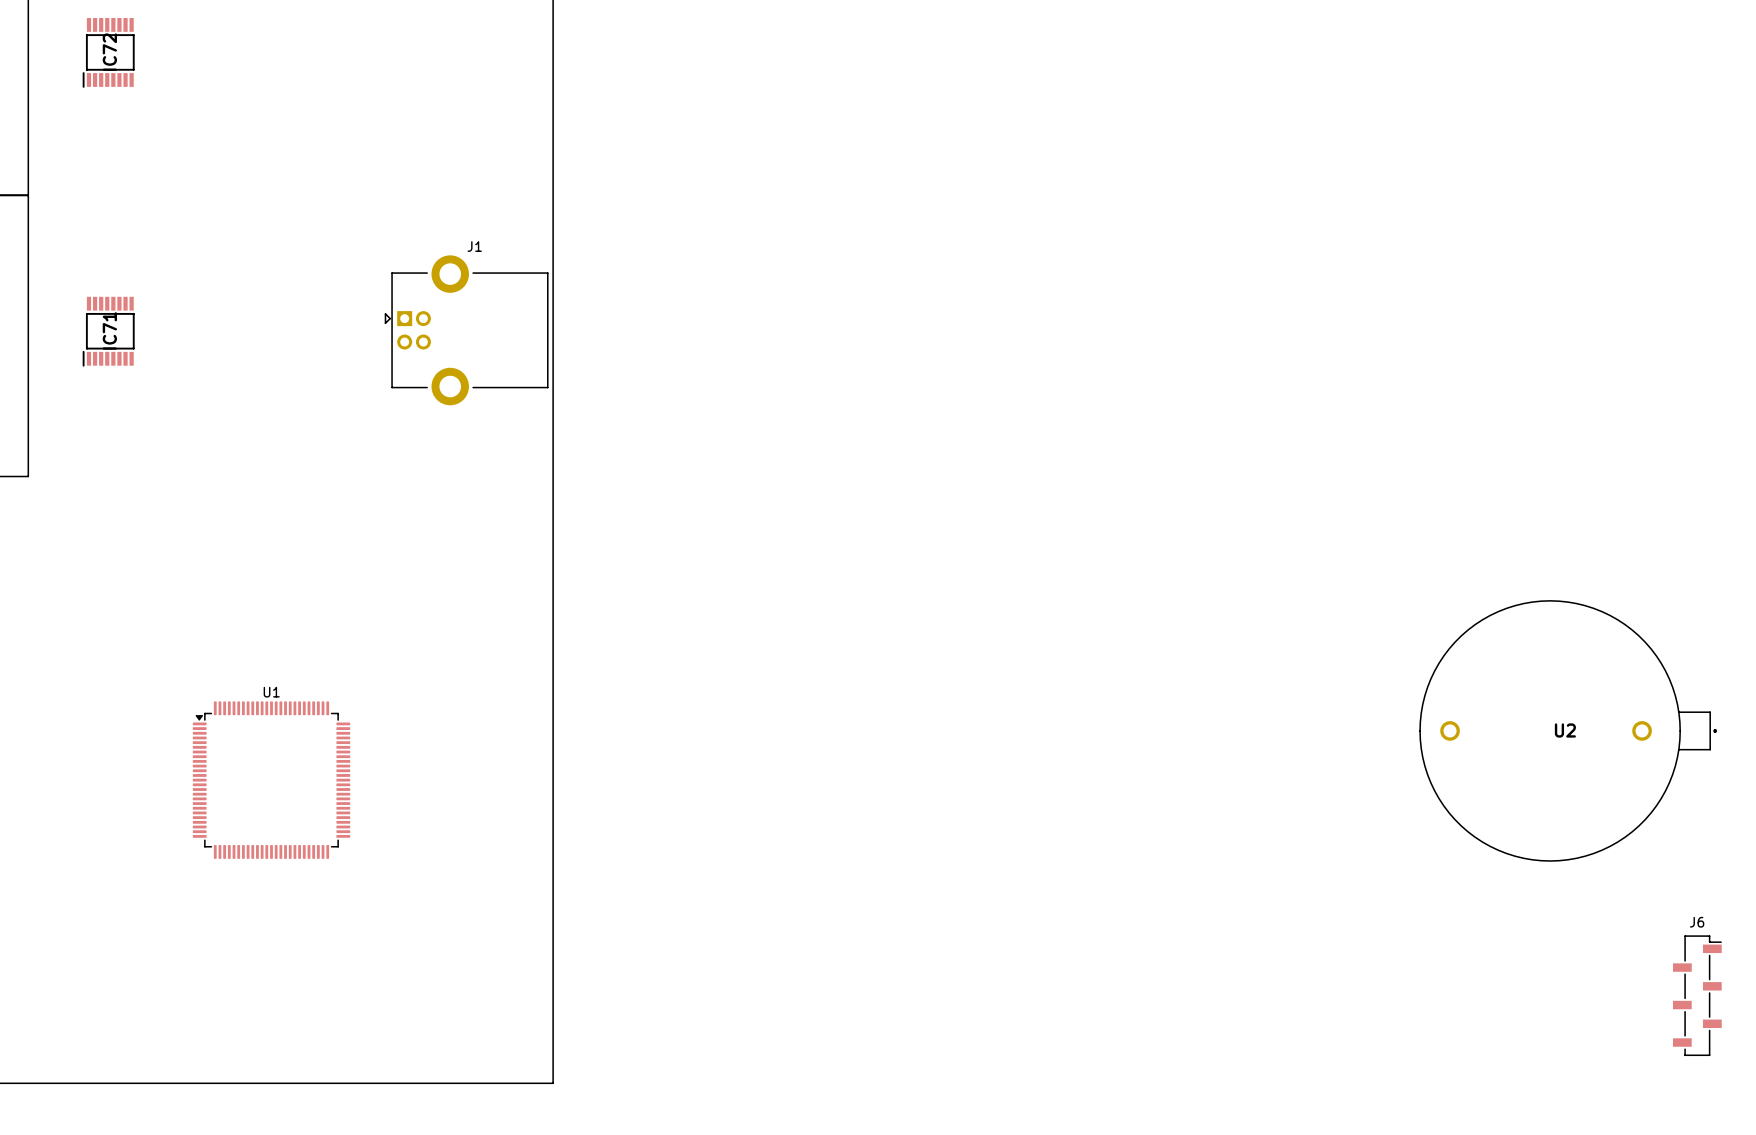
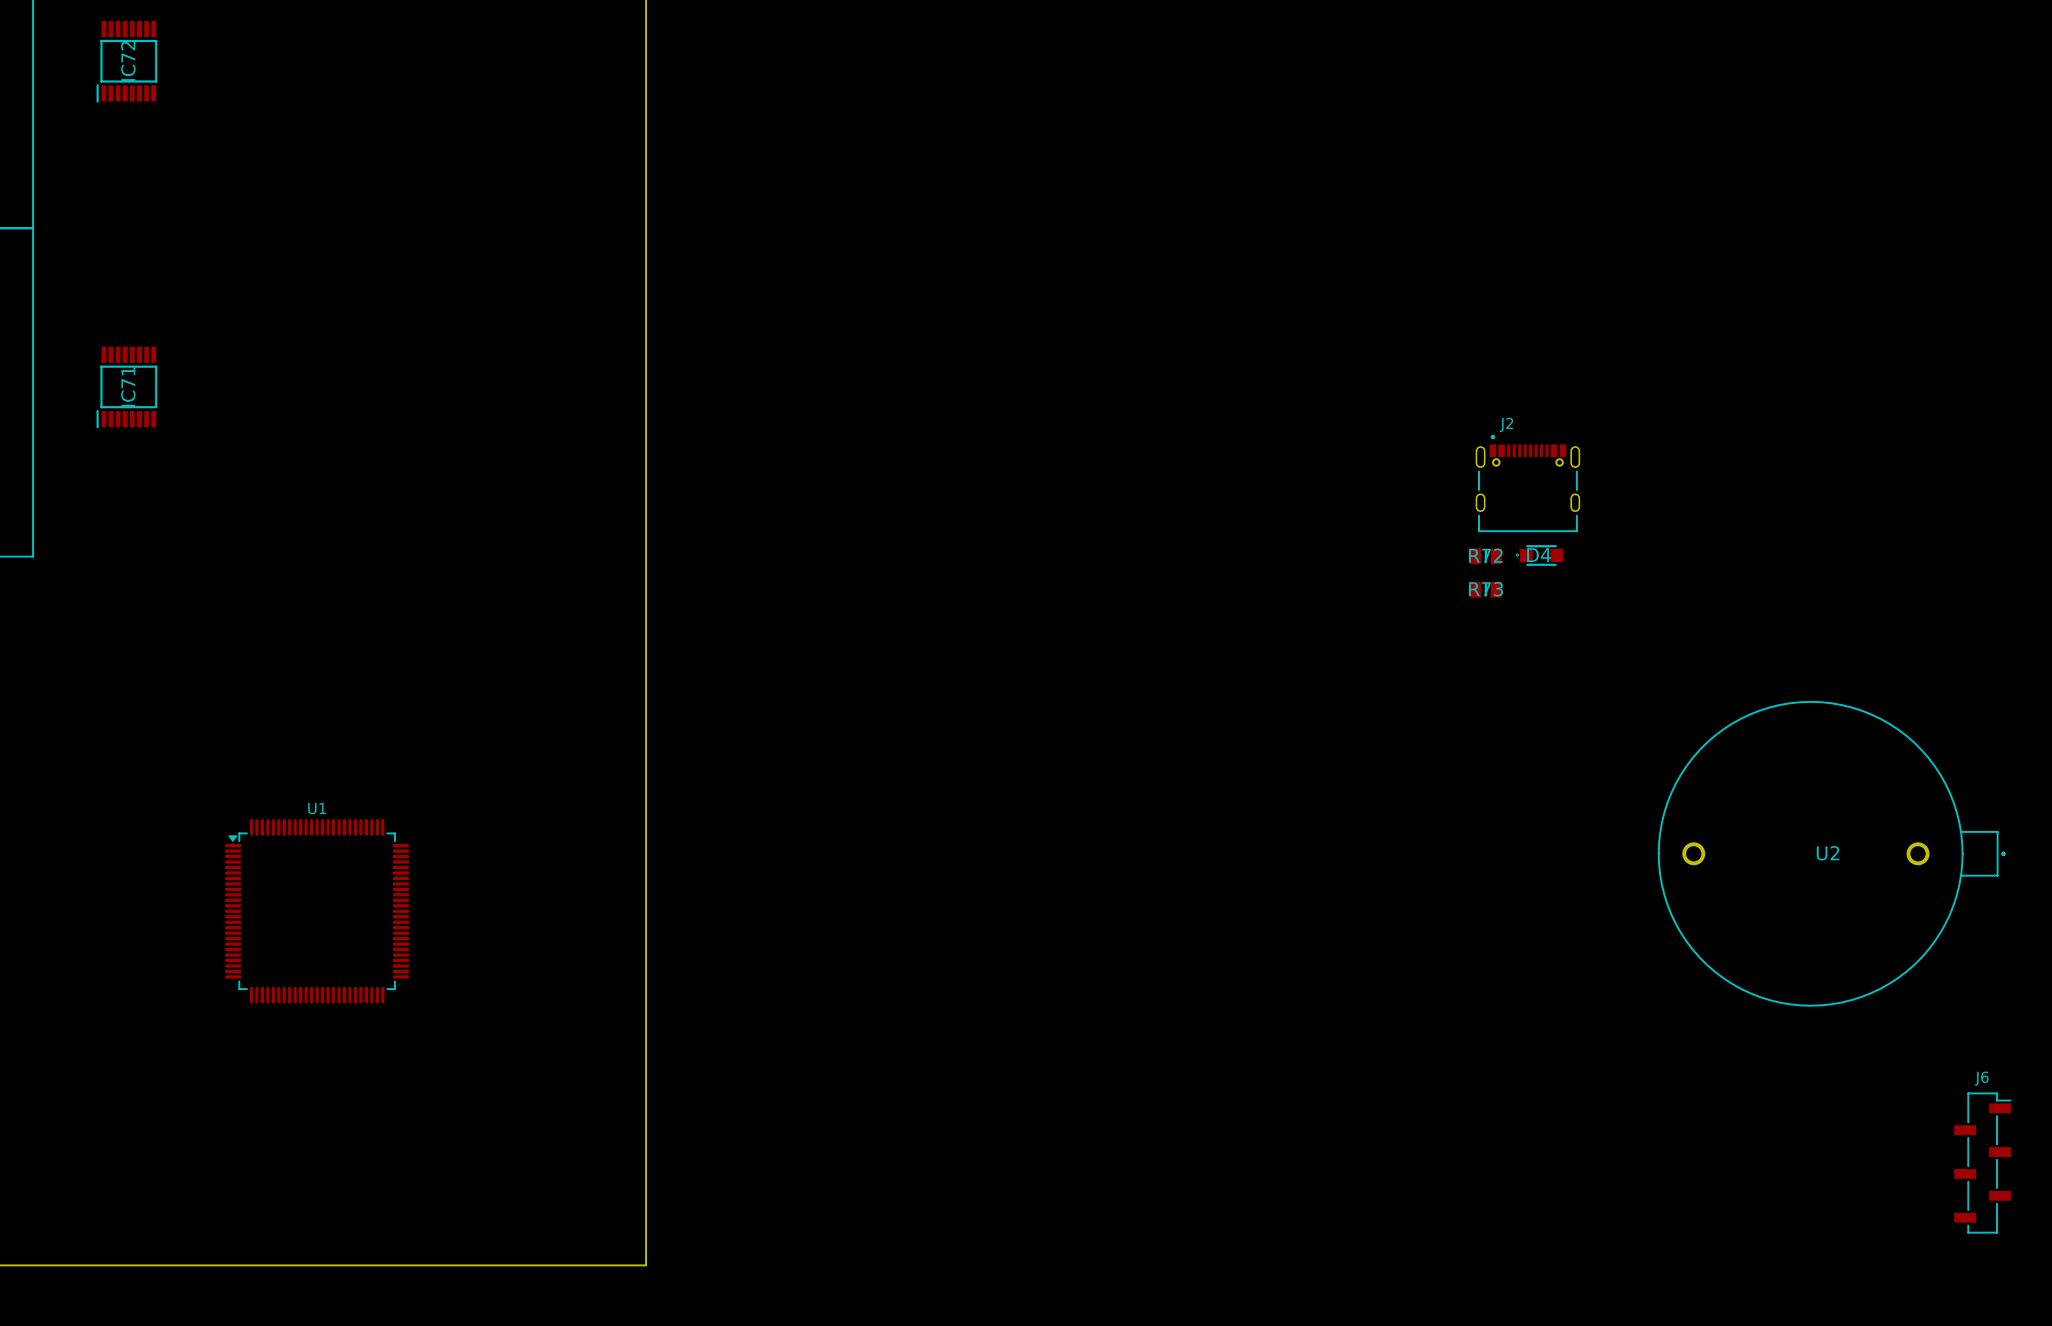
J1: (466, 330) -> none
J2: none -> (1527, 483)
D4: none -> (1539, 555)
R72: none -> (1485, 556)
R73: none -> (1485, 589)

